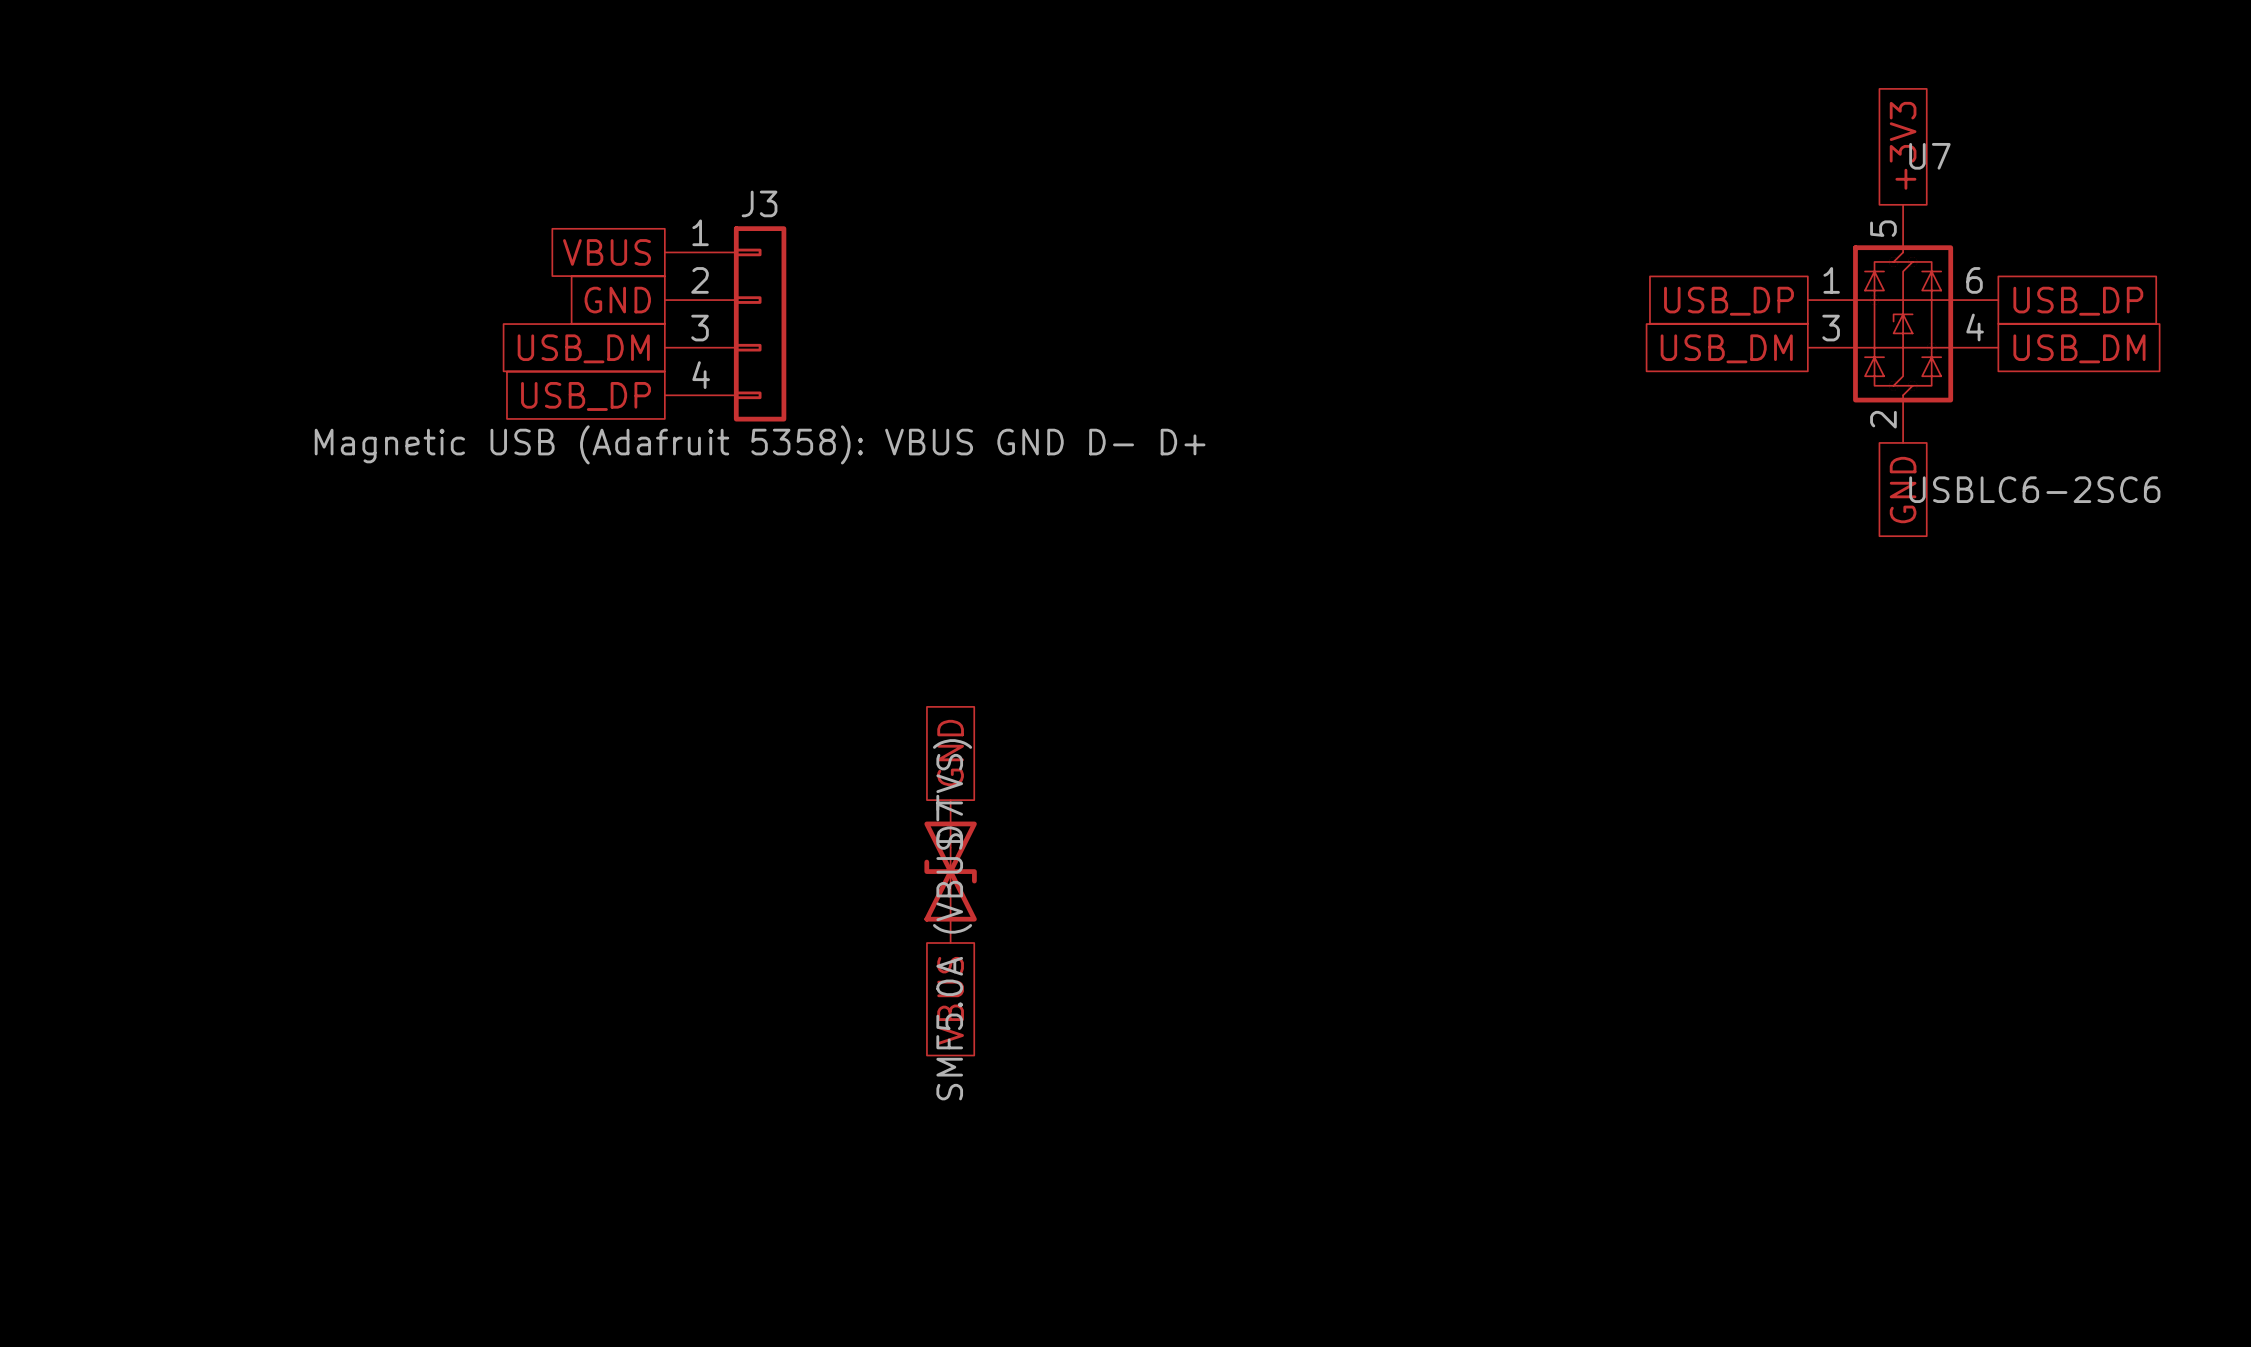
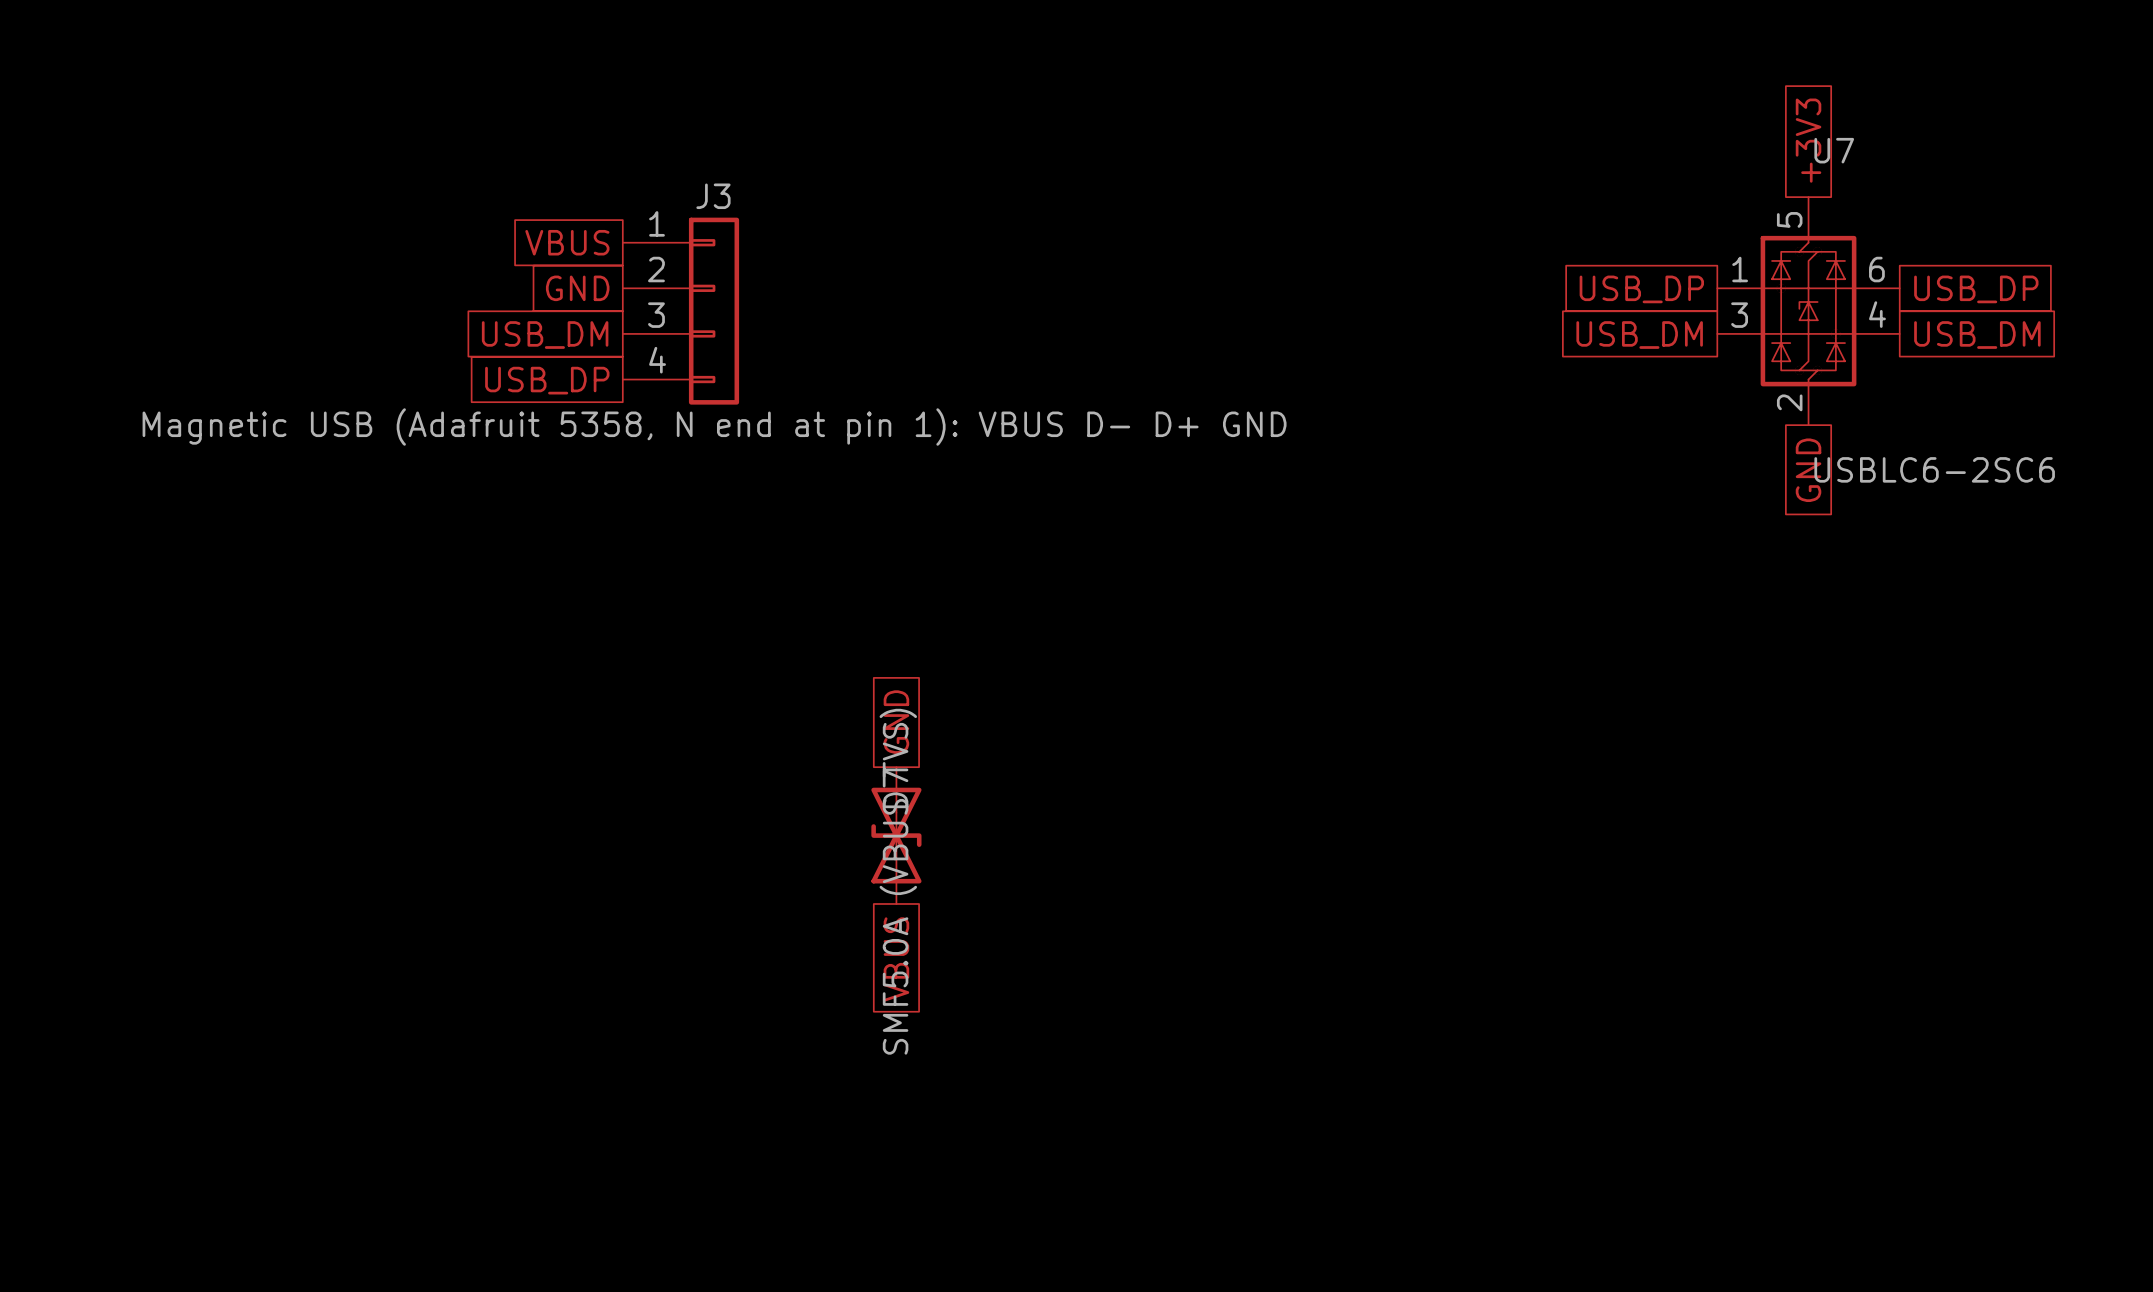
J3 value: Magnetic USB (Adafruit 5358): VBUS GND D- D+ (760, 444) -> Magnetic USB (Adafruit 5358, N end at pin 1): VBUS D- D+ GND (714, 427)

